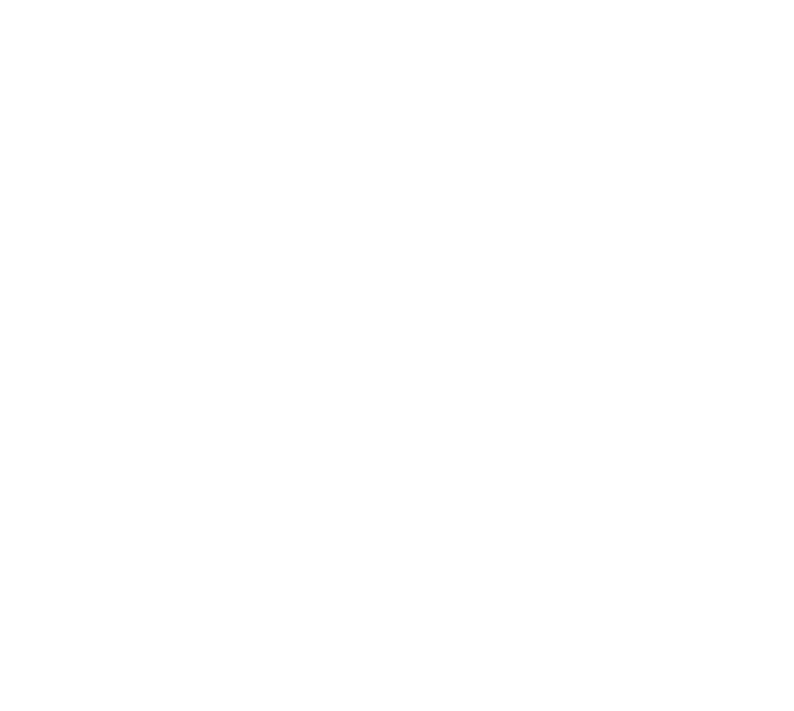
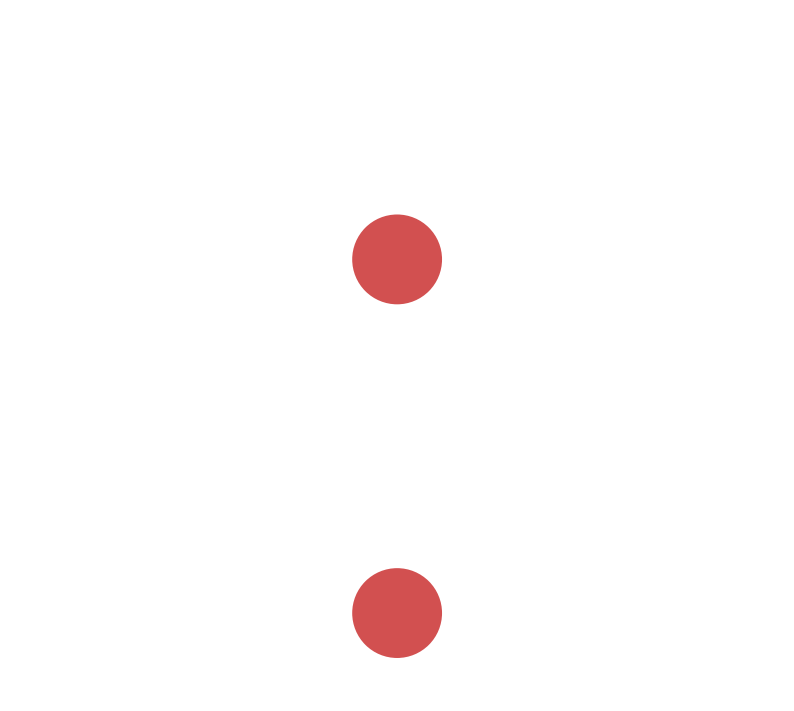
part: none -> (397, 259)
part: none -> (397, 613)

